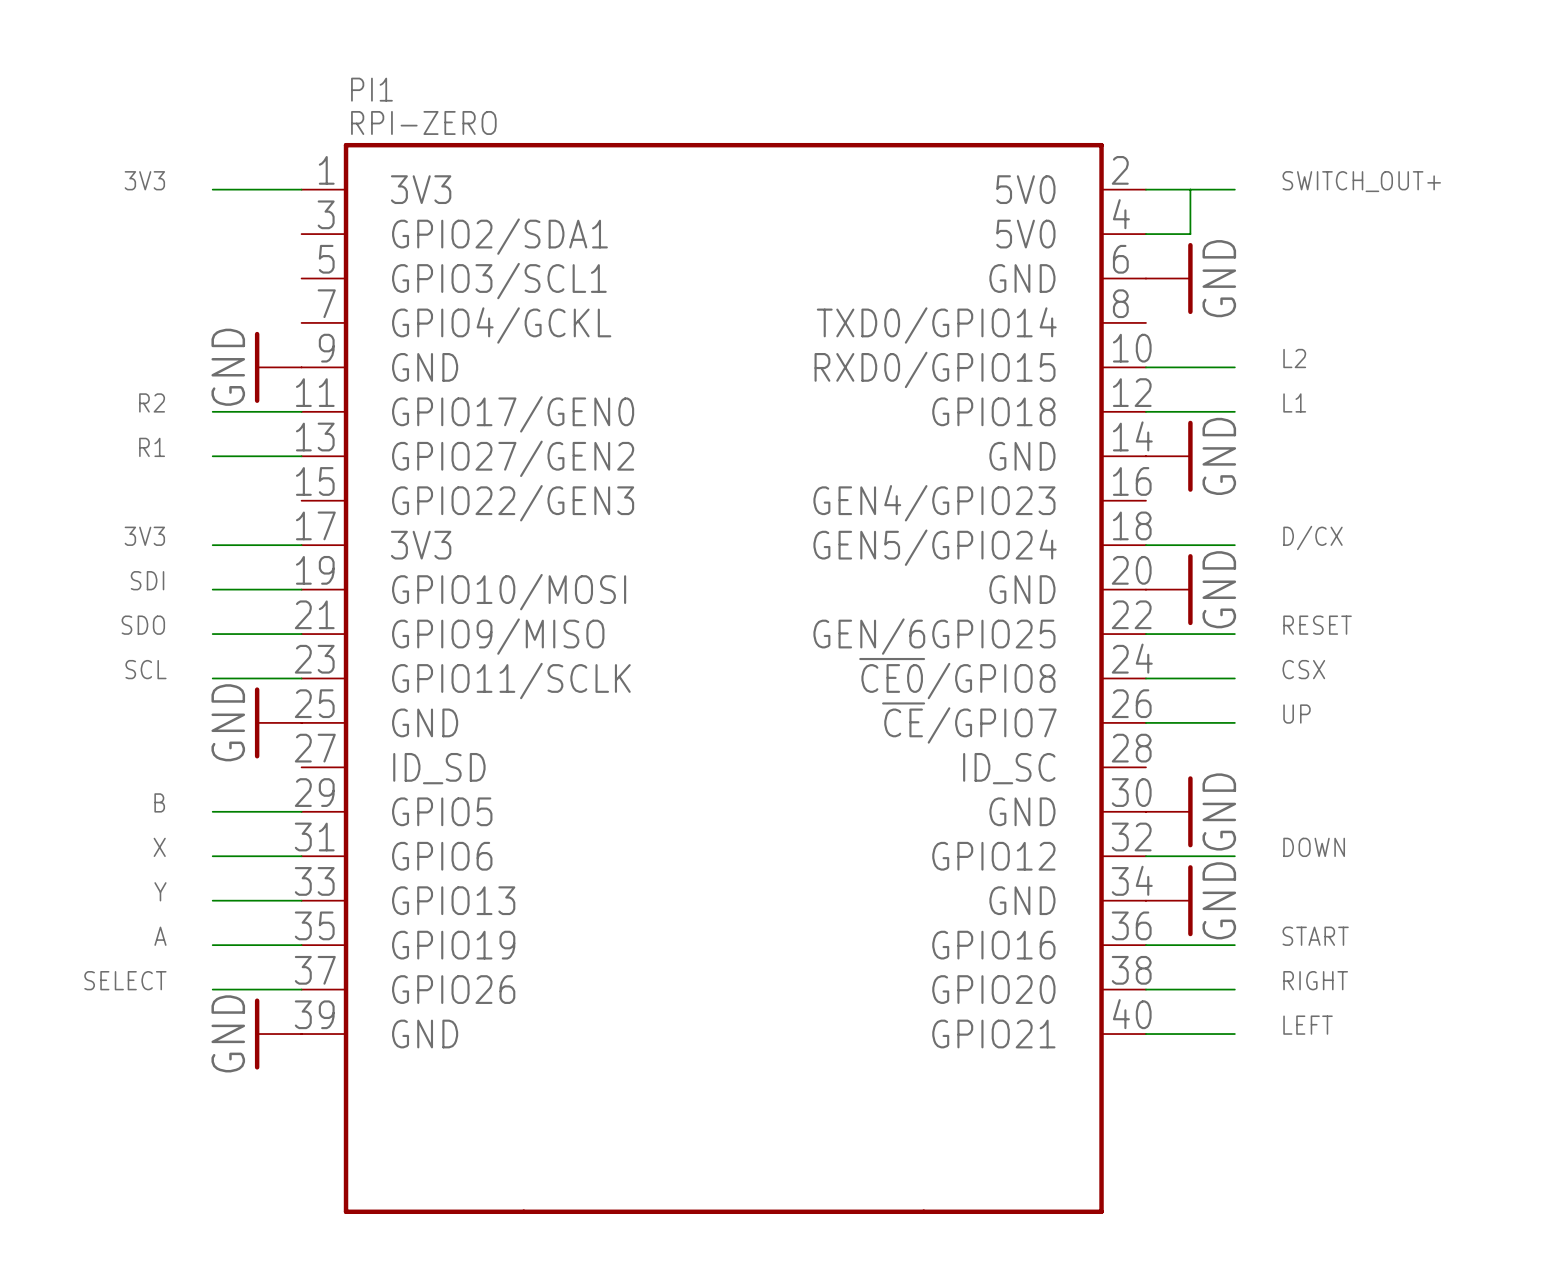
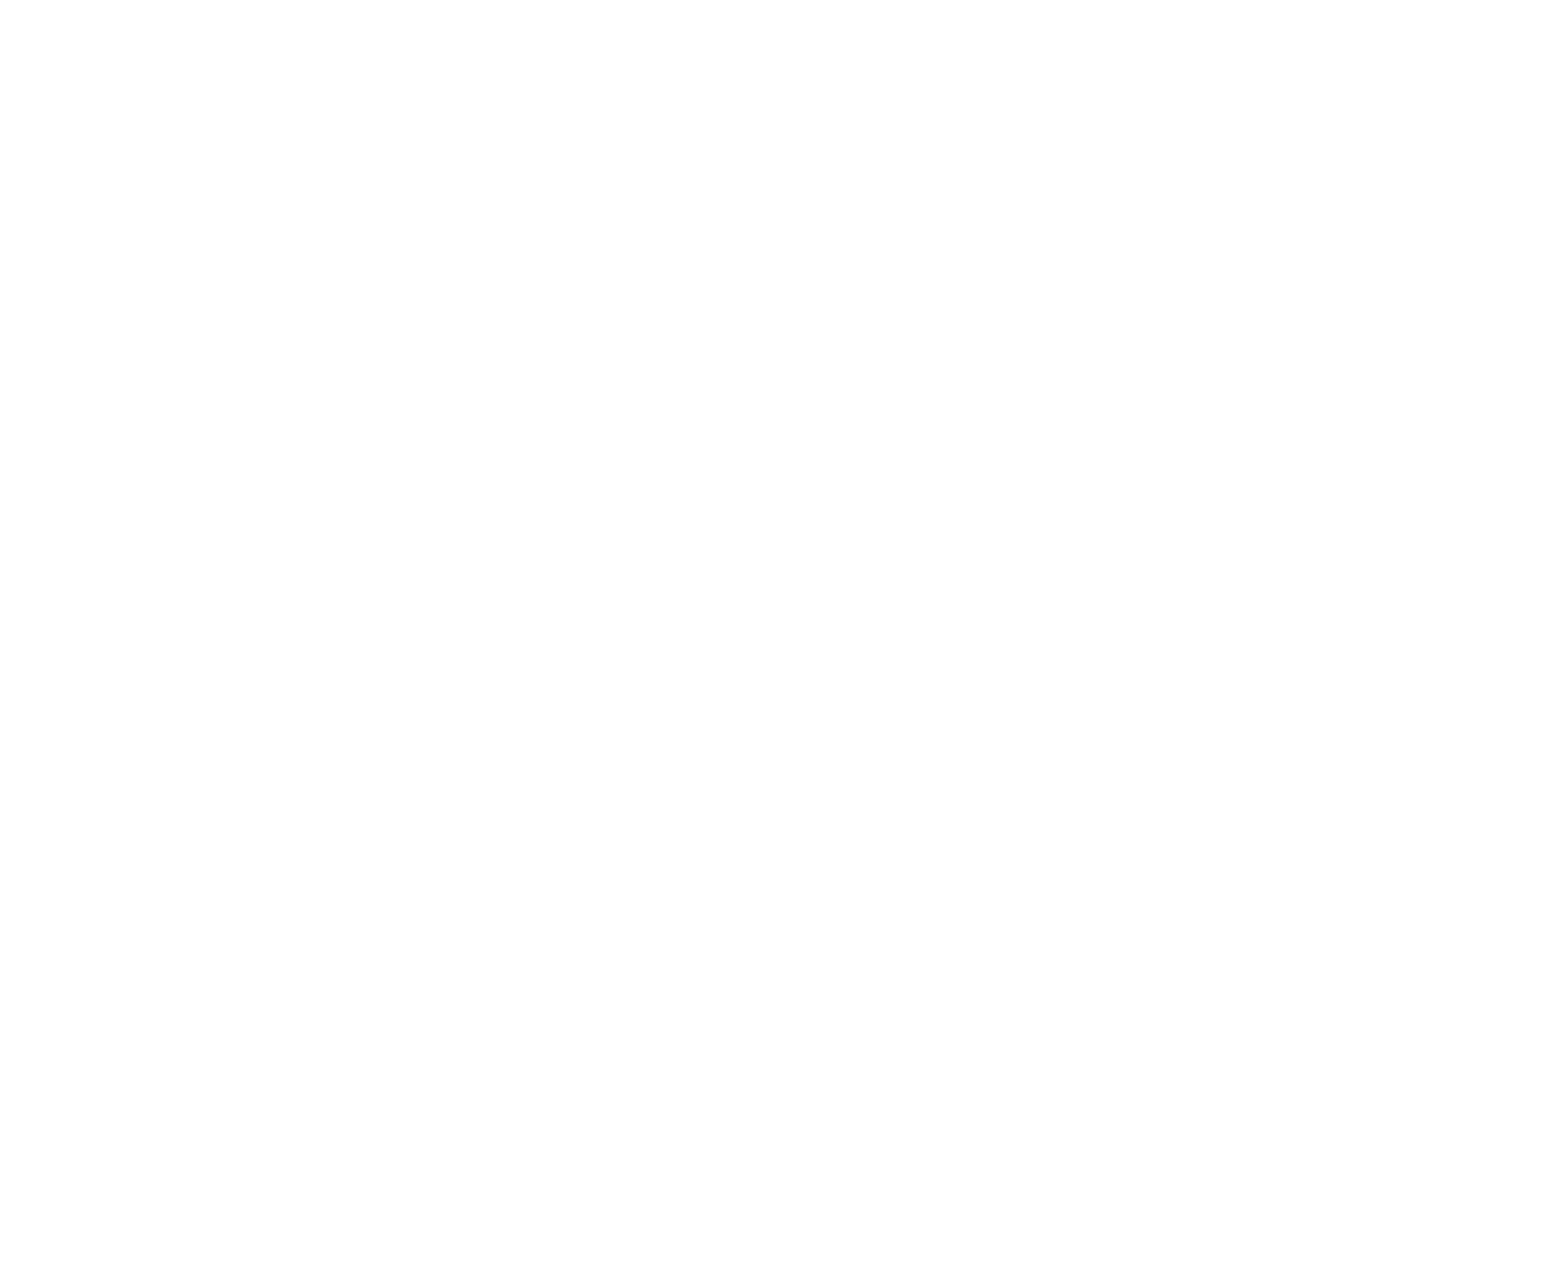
label: 3V3 (144, 180) -> none
label: SWITCH_OUT+ (1361, 181) -> none
wire: (212, 189) (301, 189) -> none
wire: (1145, 189) (1234, 189) -> none
wire: (1190, 189) (1190, 234) (1145, 234) -> none
power symbol: GND (1169, 278) -> none
label: L2 (1294, 358) -> none
power symbol: GND (278, 367) -> none
wire: (1145, 367) (1234, 367) -> none
label: R2 (152, 402) -> none
label: L1 (1294, 402) -> none
wire: (212, 411) (301, 411) -> none
wire: (1145, 411) (1234, 411) -> none
label: R1 (152, 447) -> none
wire: (212, 456) (301, 456) -> none
power symbol: GND (1169, 456) -> none
label: 3V3 (144, 536) -> none
label: D/CX (1312, 537) -> none
wire: (212, 545) (301, 545) -> none
wire: (1145, 545) (1234, 545) -> none
label: SDI (147, 580) -> none
wire: (212, 589) (301, 589) -> none
power symbol: GND (1169, 589) -> none
label: SDO (143, 625) -> none
label: RESET (1317, 625) -> none
wire: (212, 634) (301, 634) -> none
wire: (1145, 634) (1234, 634) -> none
label: SCL (145, 669) -> none
label: CSX (1303, 669) -> none
wire: (212, 678) (301, 678) -> none
PI1: RPI-ZERO (723, 678) -> none
wire: (1145, 678) (1234, 678) -> none
label: UP (1296, 714) -> none
power symbol: GND (278, 722) -> none
wire: (1145, 722) (1234, 722) -> none
label: B (159, 802) -> none
wire: (212, 811) (301, 811) -> none
power symbol: GND (1169, 811) -> none
label: X (159, 847) -> none
label: DOWN (1314, 847) -> none
wire: (212, 856) (301, 856) -> none
wire: (1145, 856) (1234, 856) -> none
label: Y (160, 891) -> none
wire: (212, 900) (301, 900) -> none
power symbol: GND (1169, 900) -> none
label: A (160, 936) -> none
label: START (1315, 936) -> none
wire: (212, 945) (301, 945) -> none
wire: (1145, 945) (1234, 945) -> none
label: SELECT (125, 980) -> none
label: RIGHT (1315, 980) -> none
wire: (212, 989) (301, 989) -> none
wire: (1145, 989) (1234, 989) -> none
label: LEFT (1308, 1025) -> none
power symbol: GND (278, 1034) -> none
wire: (1145, 1034) (1234, 1034) -> none

